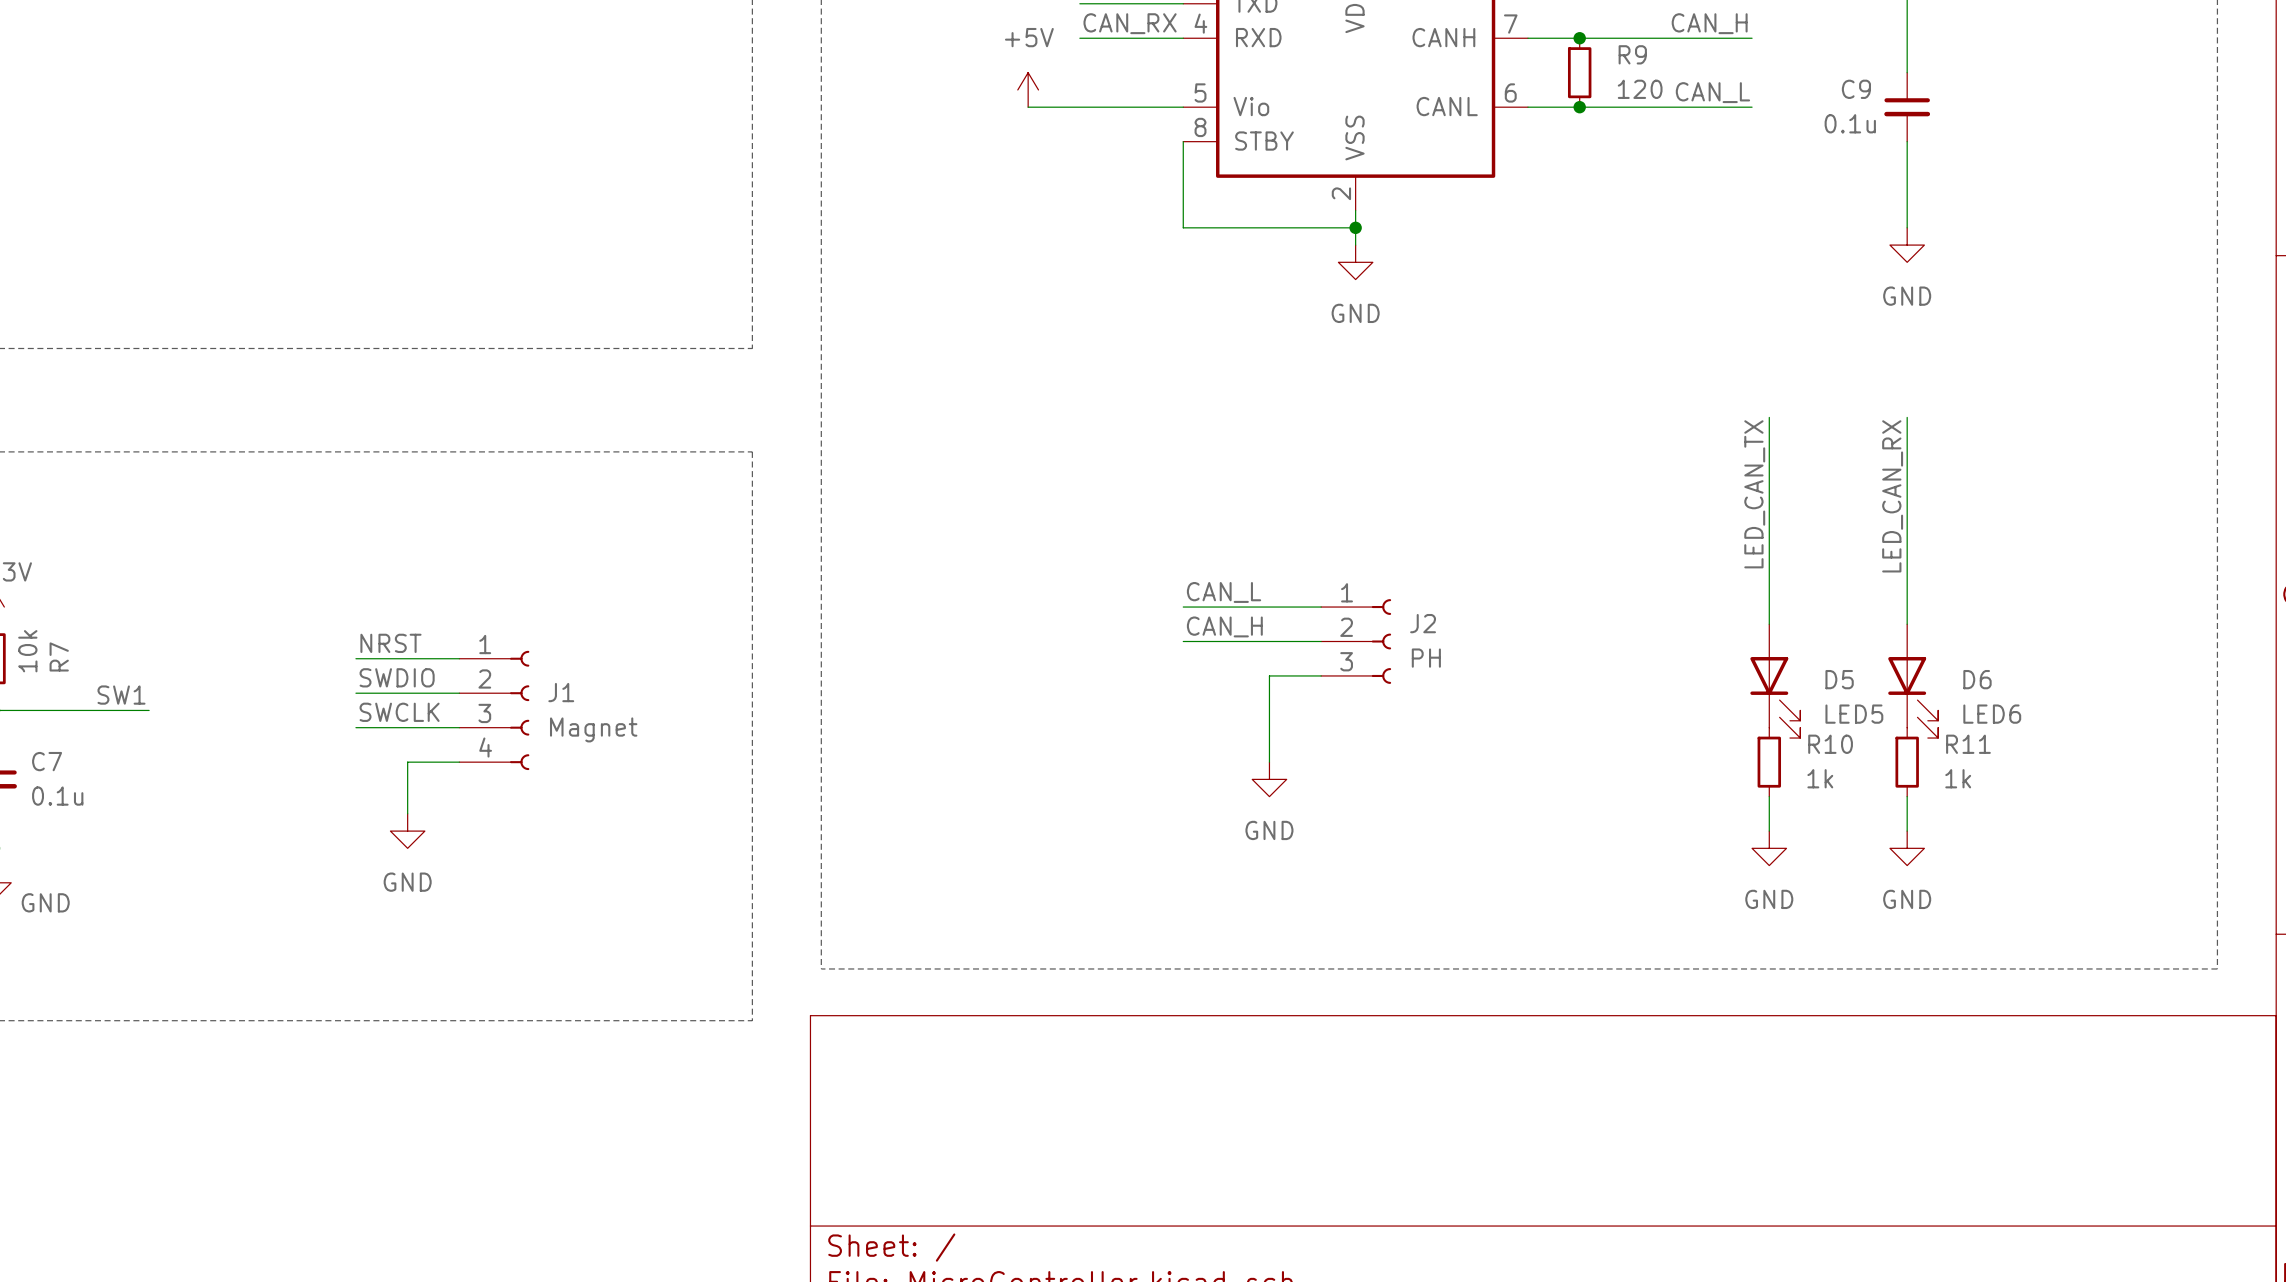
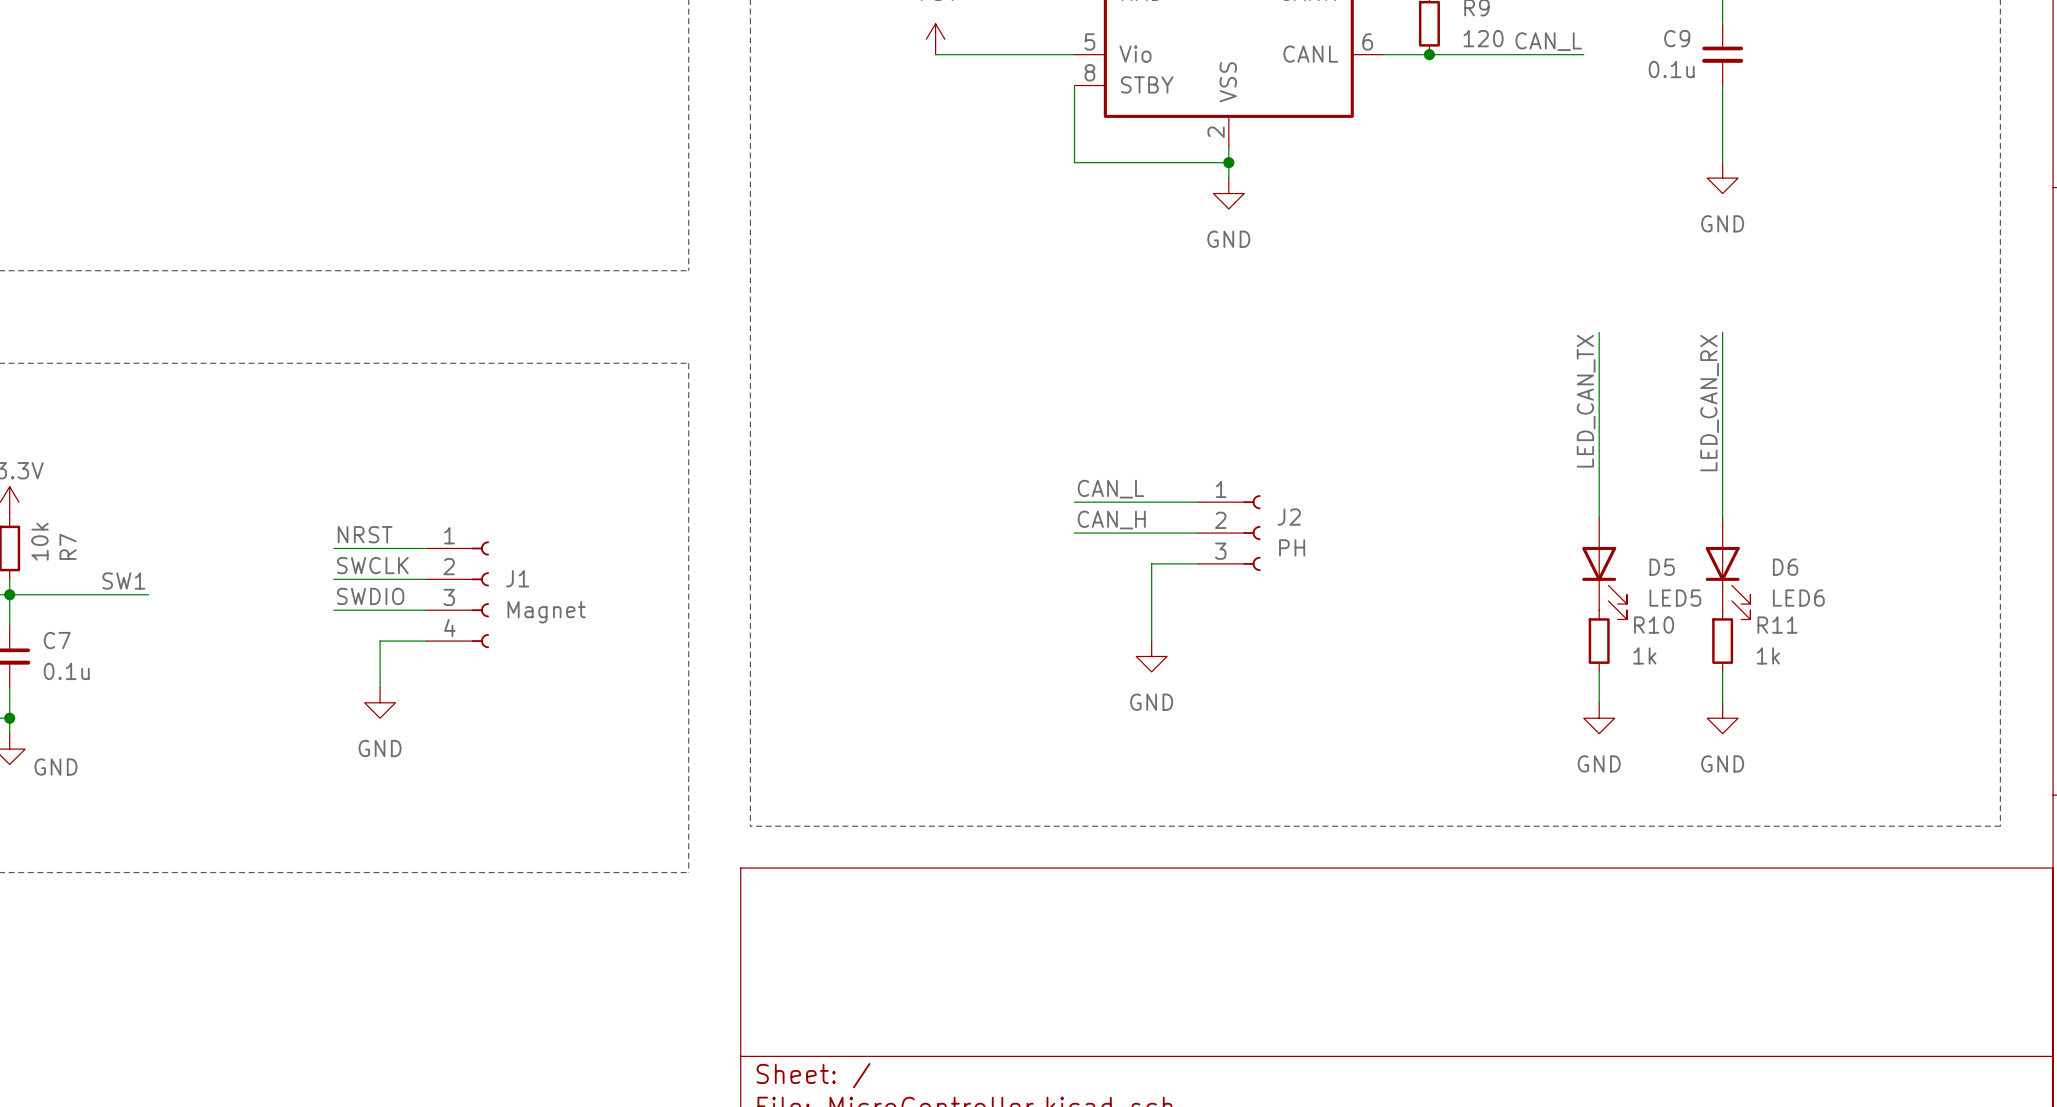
label: SWDIO (397, 677) -> SWCLK (372, 565)
label: SWCLK (399, 712) -> SWDIO (370, 596)

